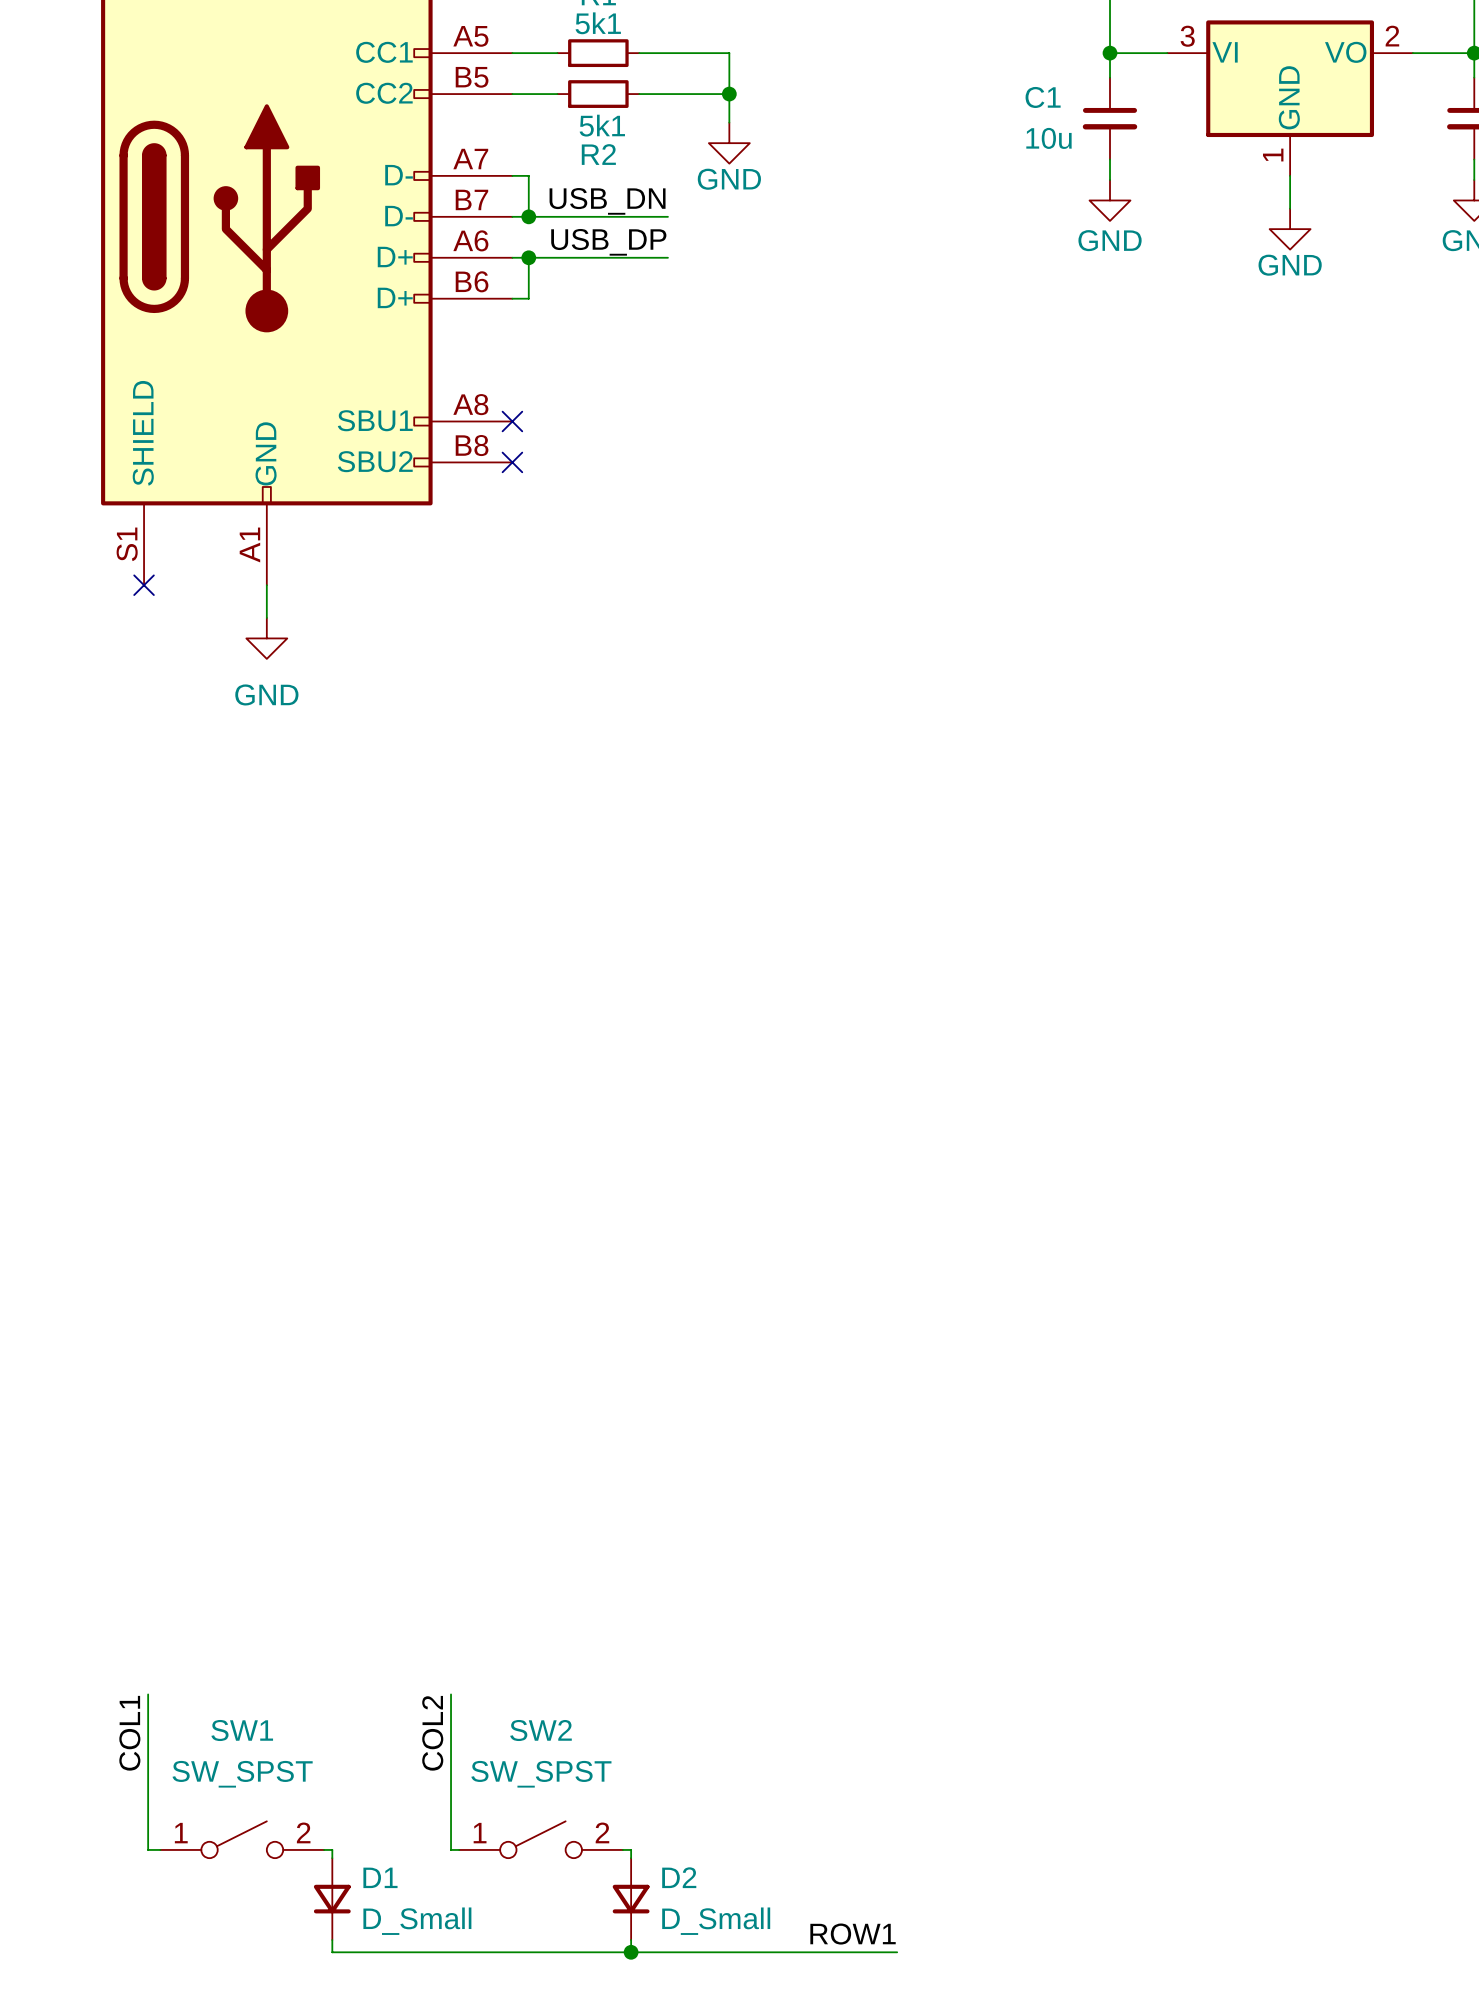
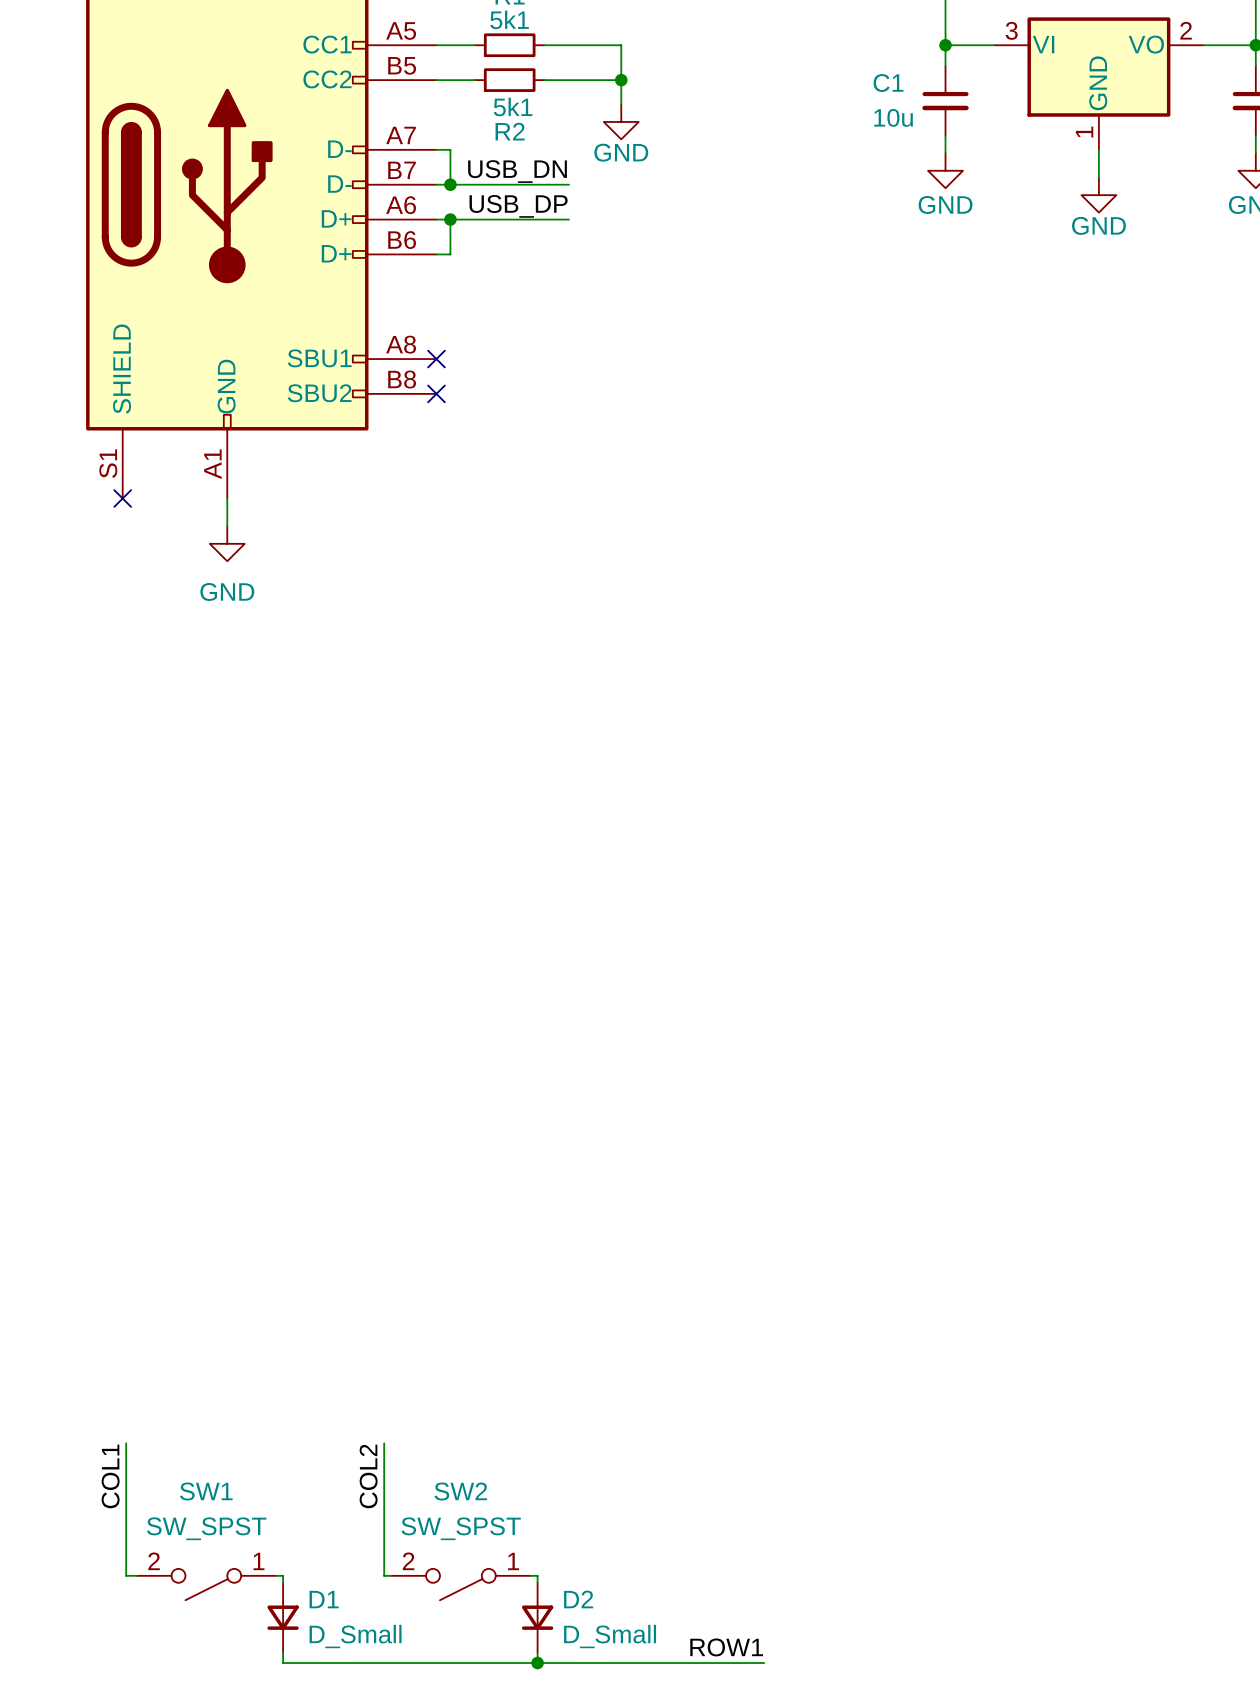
SW1 rotation: 0° (242, 1839) -> 180° (206, 1584)
SW2 rotation: 0° (541, 1839) -> 180° (460, 1584)

